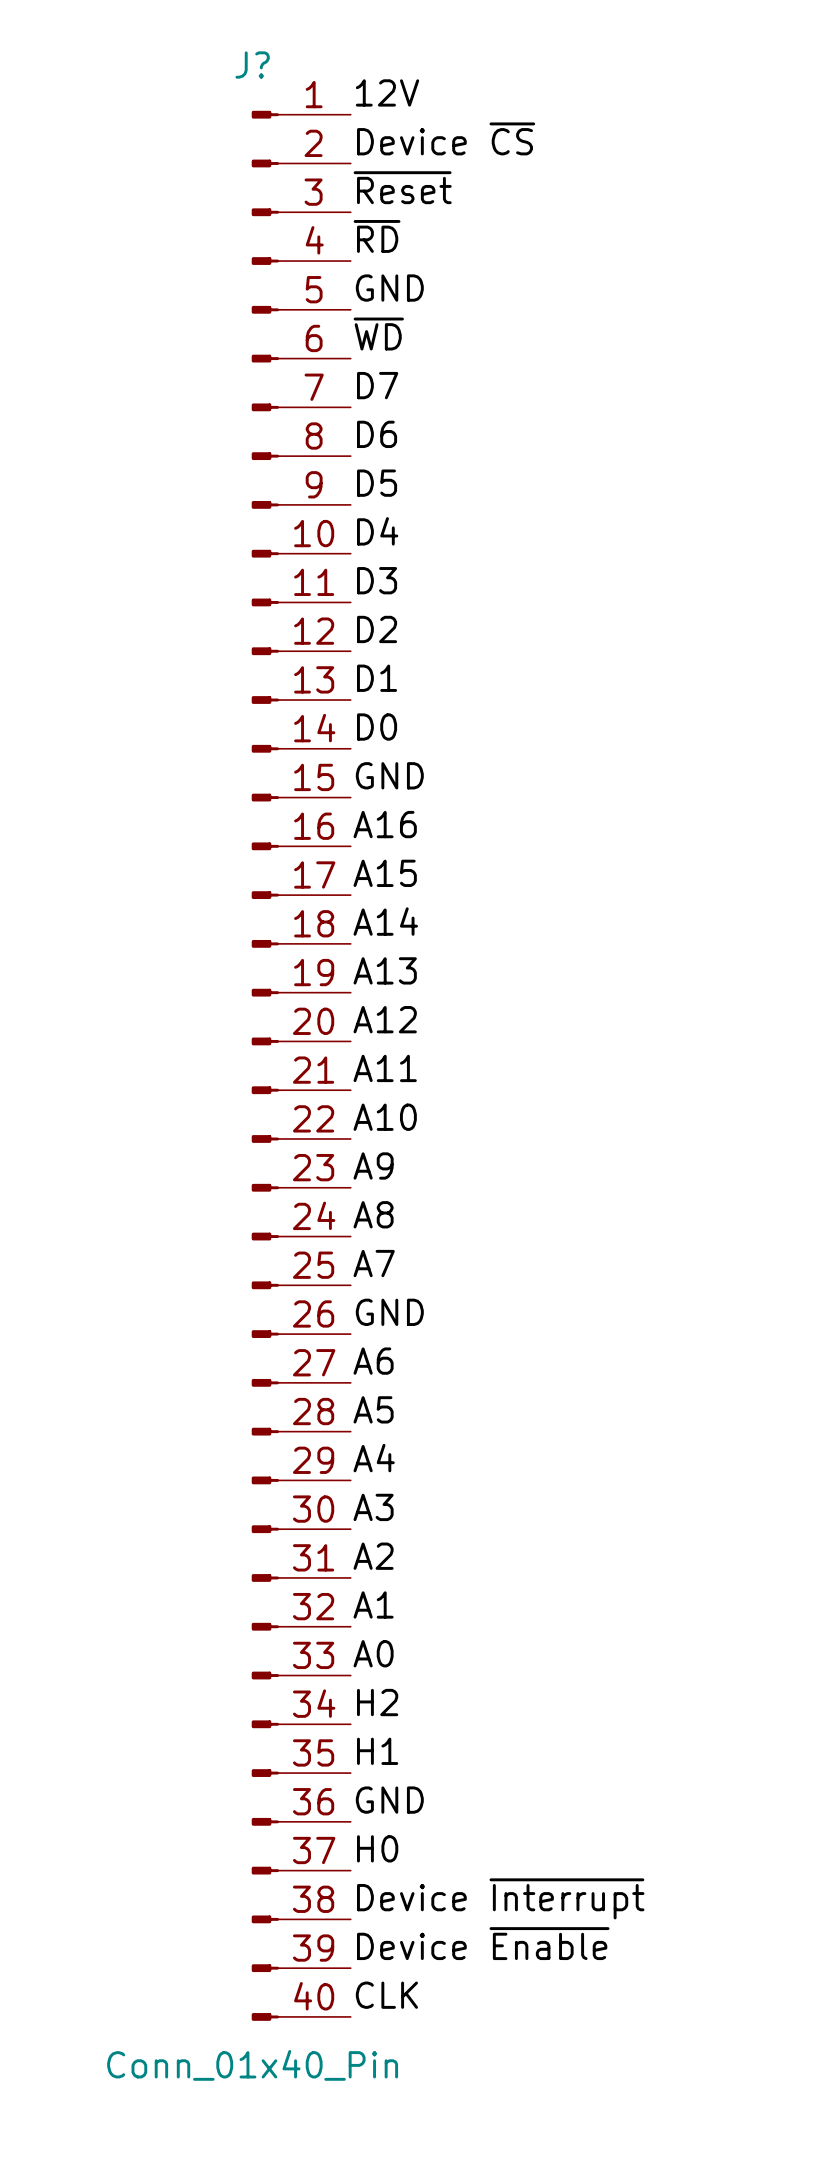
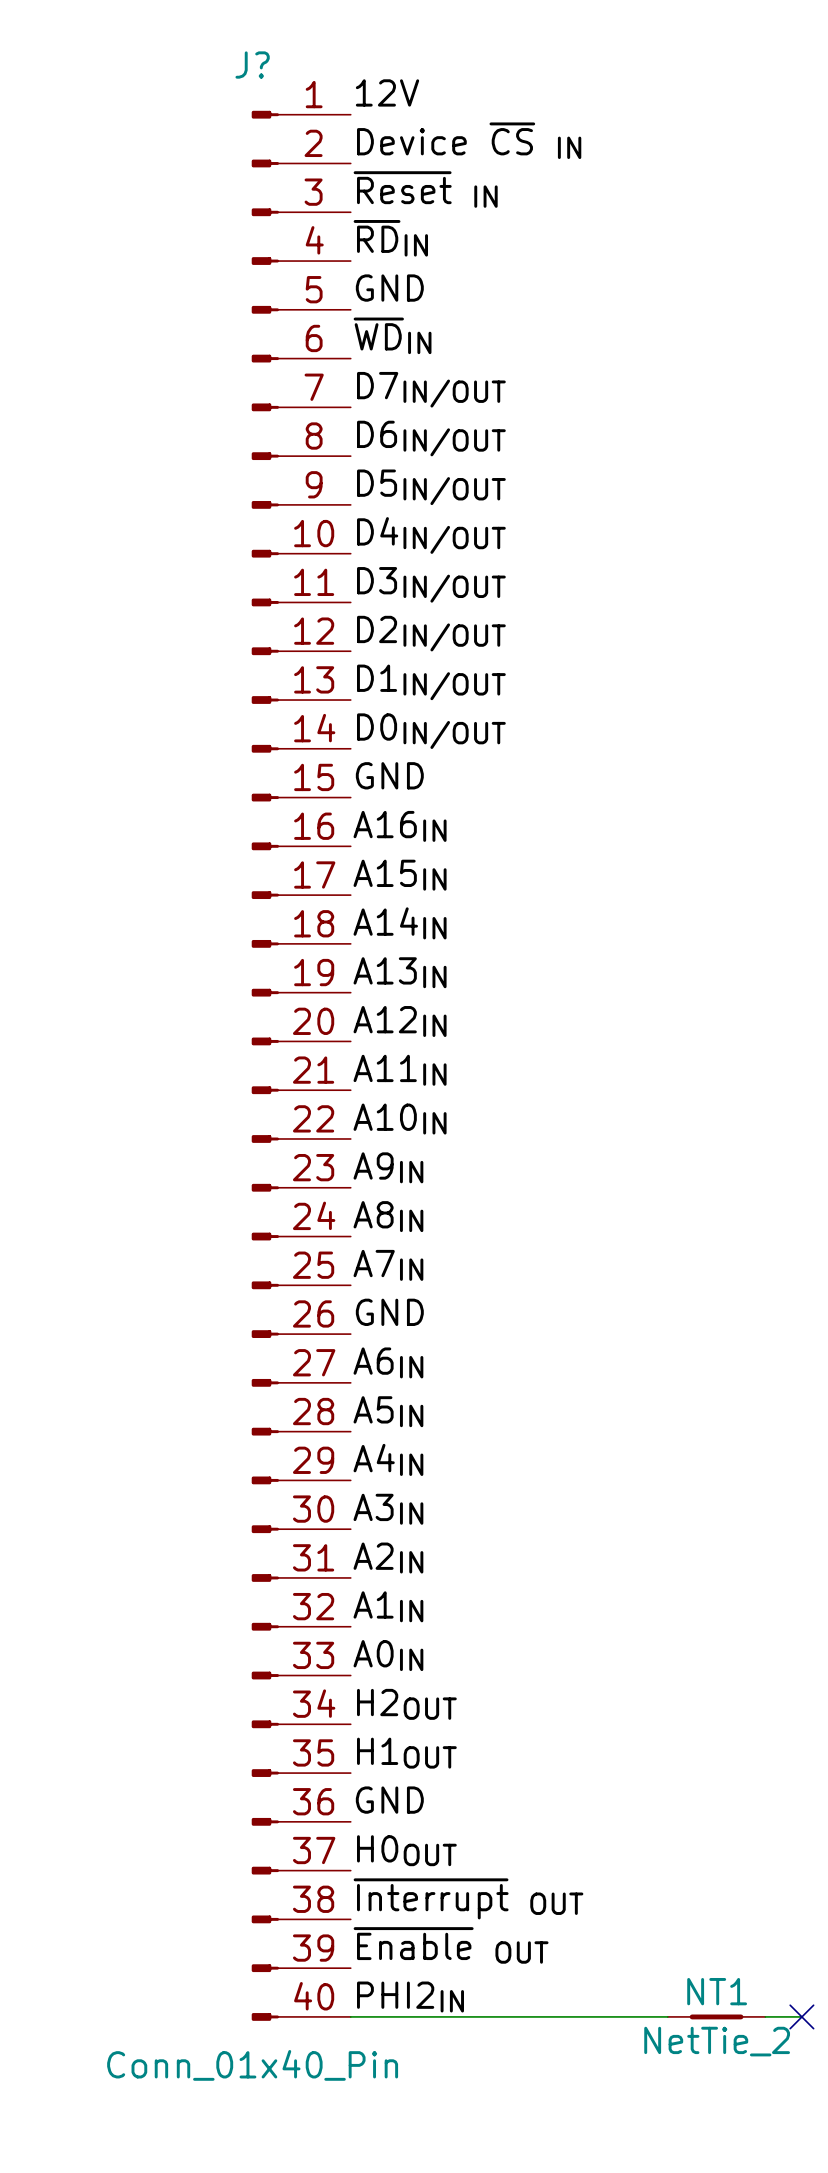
label: Device ~{CS} (446, 138) -> Device ~{CS} IN (469, 140)
label: ~{Reset} (402, 187) -> ~{Reset} IN (425, 189)
label: ~{RD} (377, 236) -> ~{RD}IN (390, 238)
label: ~{WD} (378, 334) -> ~{WD}IN (392, 335)
label: D7 (377, 385) -> D7IN/OUT (431, 389)
label: D6 (377, 434) -> D6IN/OUT (431, 438)
label: D5 (377, 483) -> D5IN/OUT (431, 487)
label: D4 (377, 531) -> D4IN/OUT (431, 535)
label: D3 (377, 580) -> D3IN/OUT (431, 584)
label: D2 (377, 629) -> D2IN/OUT (431, 633)
label: D1 (377, 678) -> D1IN/OUT (431, 682)
label: D0 (377, 727) -> D0IN/OUT (431, 731)
label: A16 (385, 824) -> A16IN (400, 826)
label: A15 (385, 873) -> A15IN (400, 875)
label: A14 (385, 921) -> A14IN (400, 923)
label: A13 (385, 970) -> A13IN (400, 972)
label: A12 (385, 1019) -> A12IN (400, 1021)
label: A11 (385, 1068) -> A11IN (400, 1070)
label: A10 (385, 1117) -> A10IN (400, 1119)
label: A9 (373, 1166) -> A9IN (388, 1167)
label: A8 (373, 1214) -> A8IN (388, 1216)
label: A7 (374, 1263) -> A7IN (388, 1265)
label: A6 (373, 1361) -> A6IN (388, 1362)
label: A5 (373, 1409) -> A5IN (388, 1411)
label: A4 (374, 1458) -> A4IN (388, 1459)
label: A3 (373, 1507) -> A3IN (388, 1509)
label: A2 (373, 1556) -> A2IN (388, 1558)
label: A1 (373, 1604) -> A1IN (388, 1606)
label: A0 (373, 1653) -> A0IN (388, 1655)
label: H2 (377, 1702) -> H2OUT (406, 1704)
label: H1 (377, 1751) -> H1OUT (406, 1753)
label: H0 (377, 1848) -> H0OUT (406, 1850)
label: Device ~{Interrupt} (500, 1898) -> ~{Interrupt} OUT (468, 1898)
label: Device ~{Enable} (483, 1943) -> ~{Enable} OUT (451, 1945)
label: CLK (386, 1995) -> PHI2IN (410, 1997)
wire: none -> (350, 2016) (667, 2016)
NT1: none -> NetTie_2 (716, 2016)
wire: none -> (765, 2016) (801, 2016)
no-connect mark: none -> (801, 2016)

